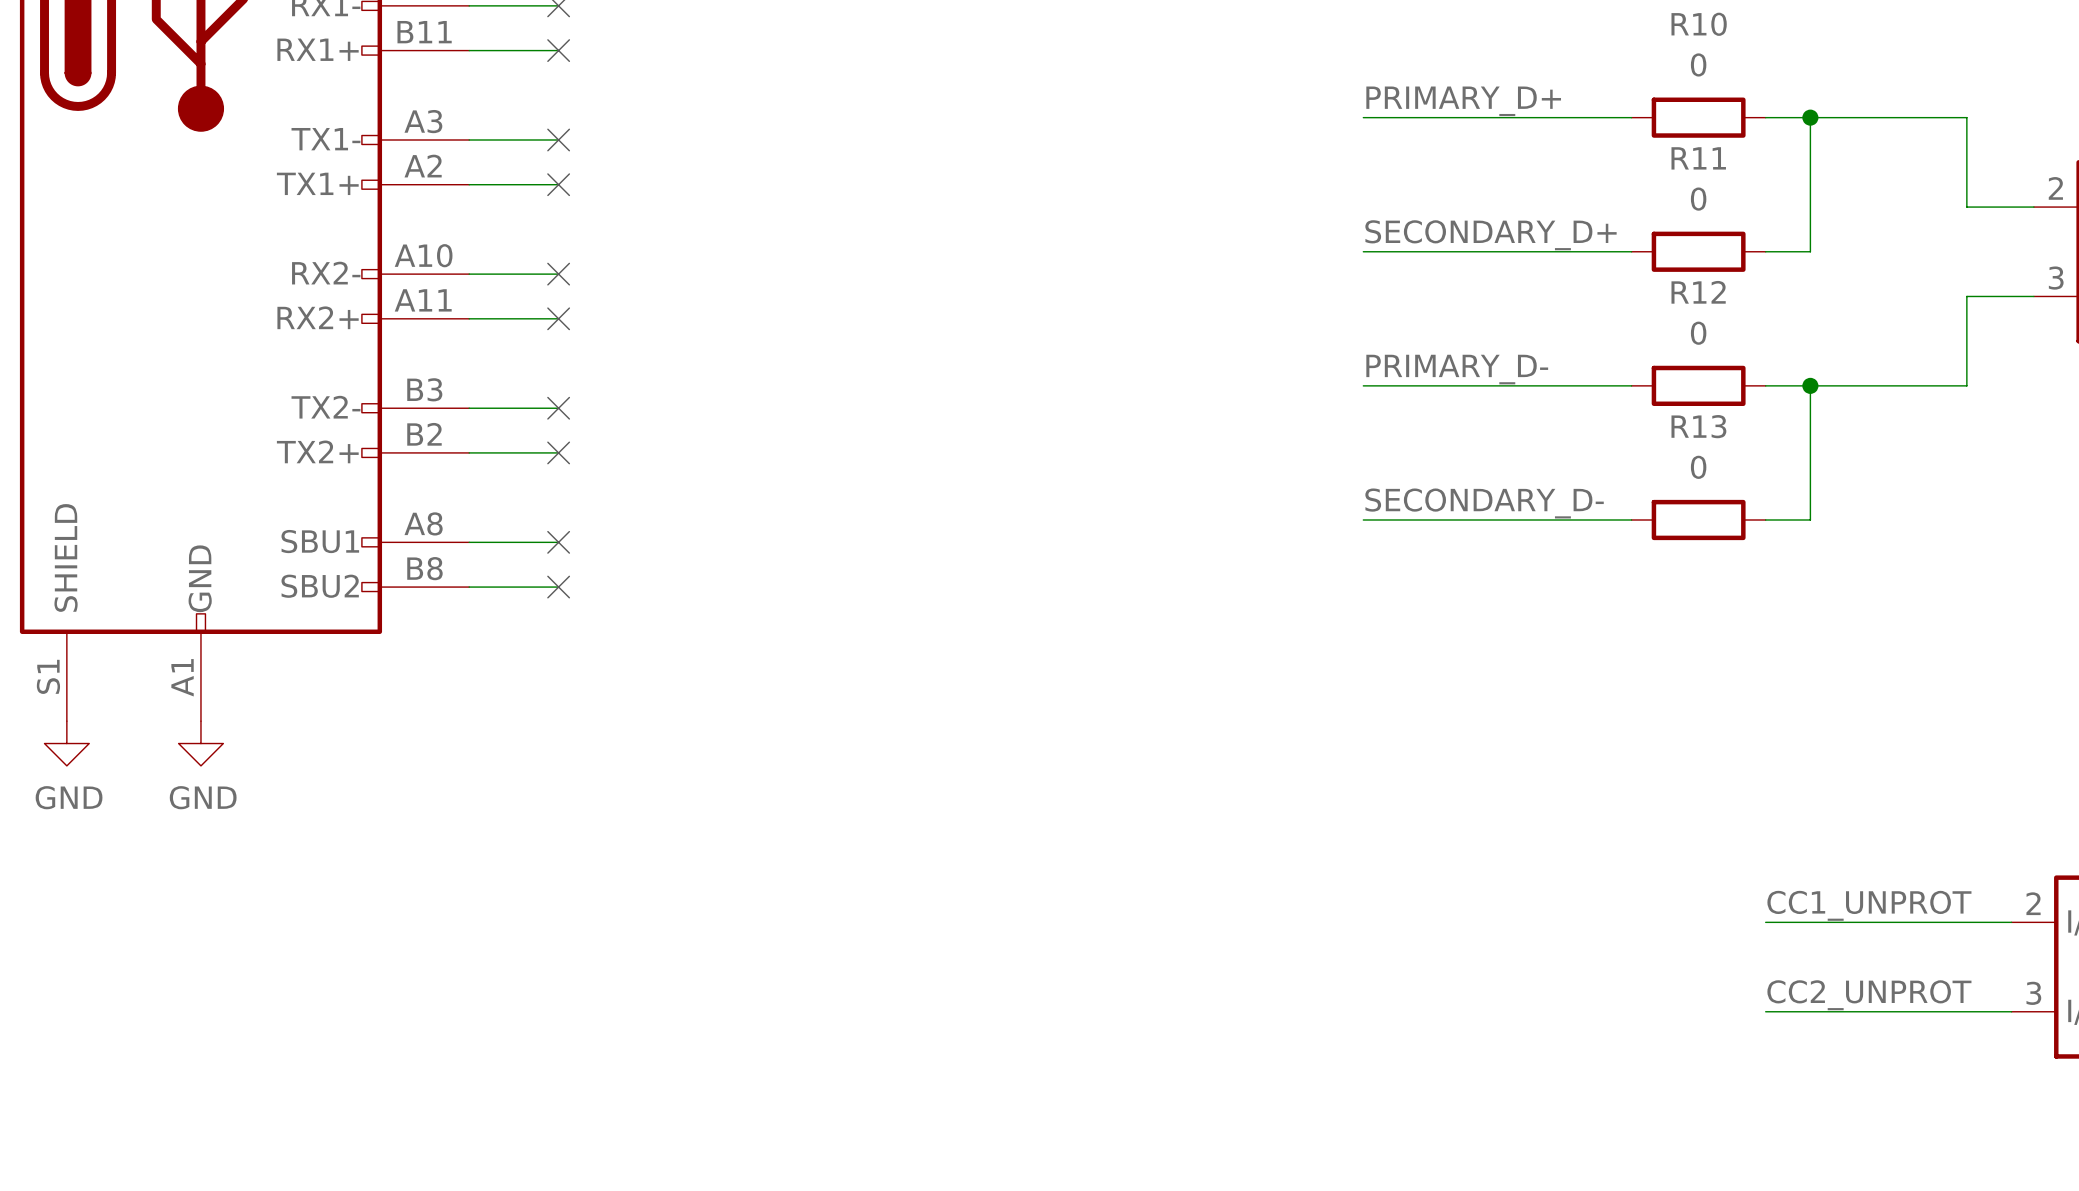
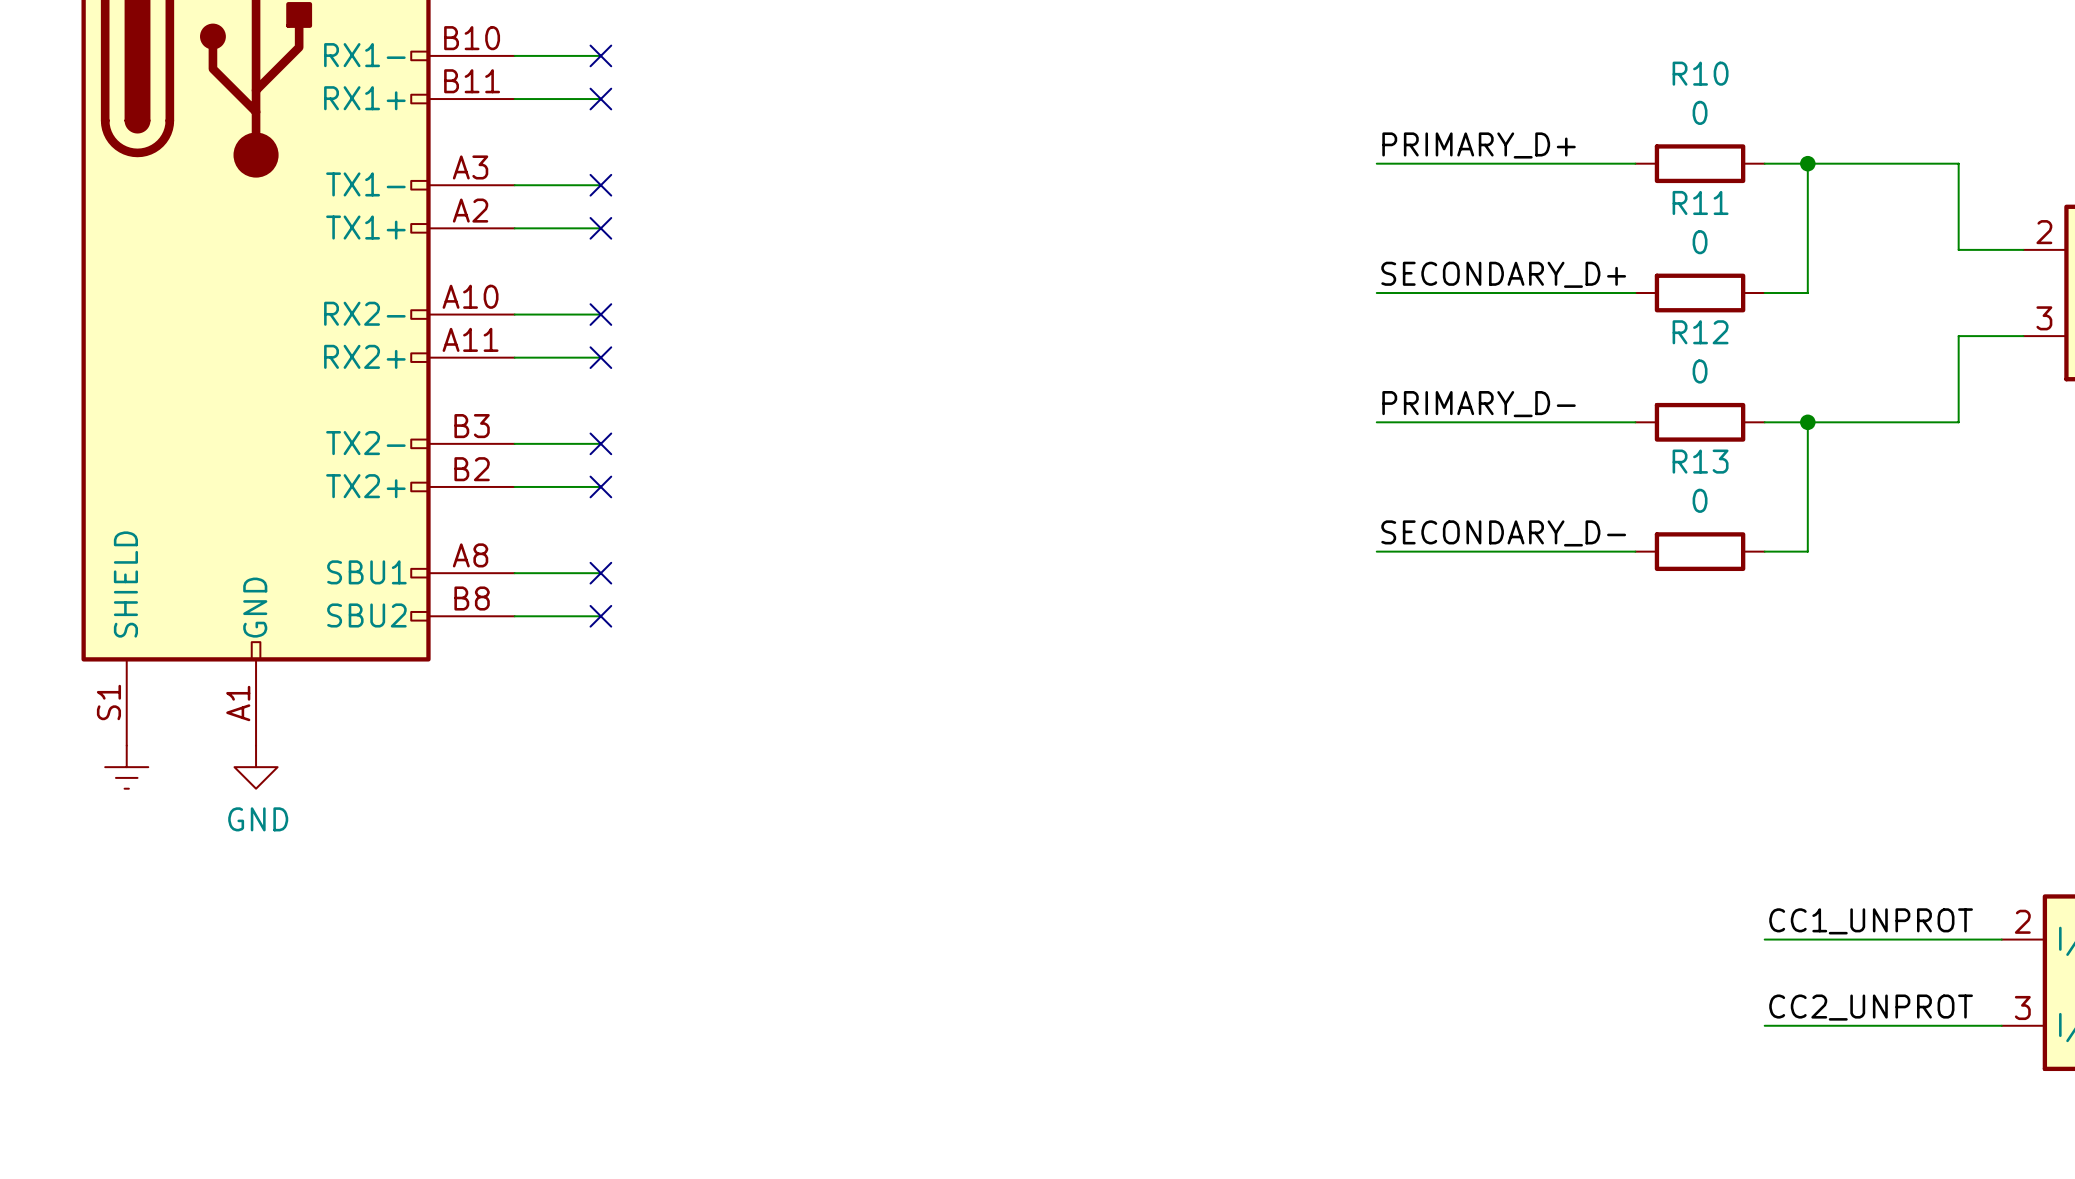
power symbol shape: [44, 721, 90, 766] -> [105, 745, 149, 789]
power symbol text: GND (69, 797) -> none

